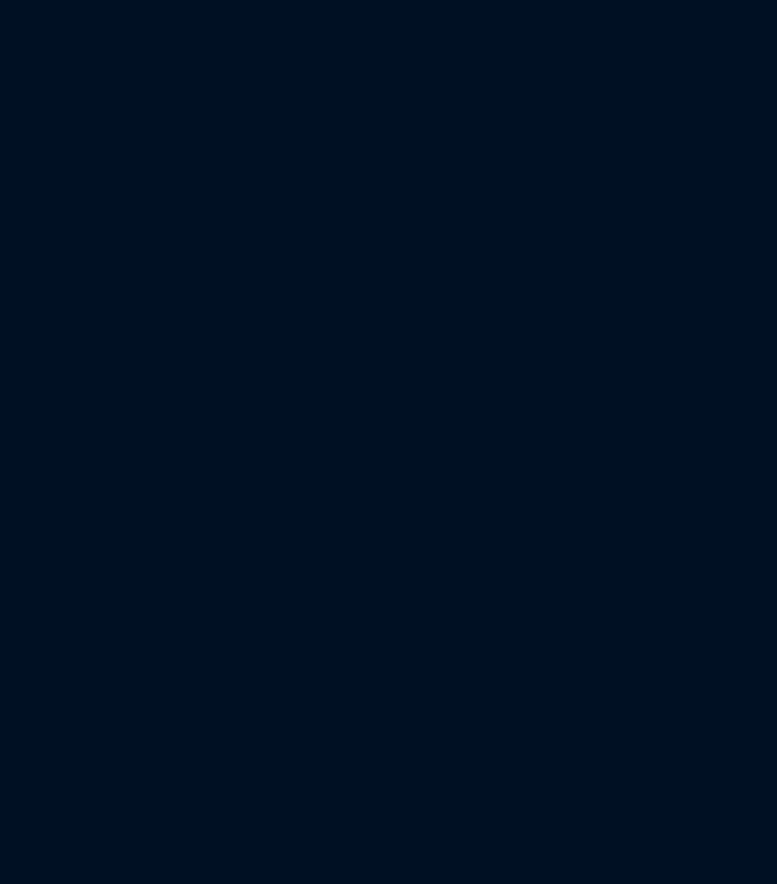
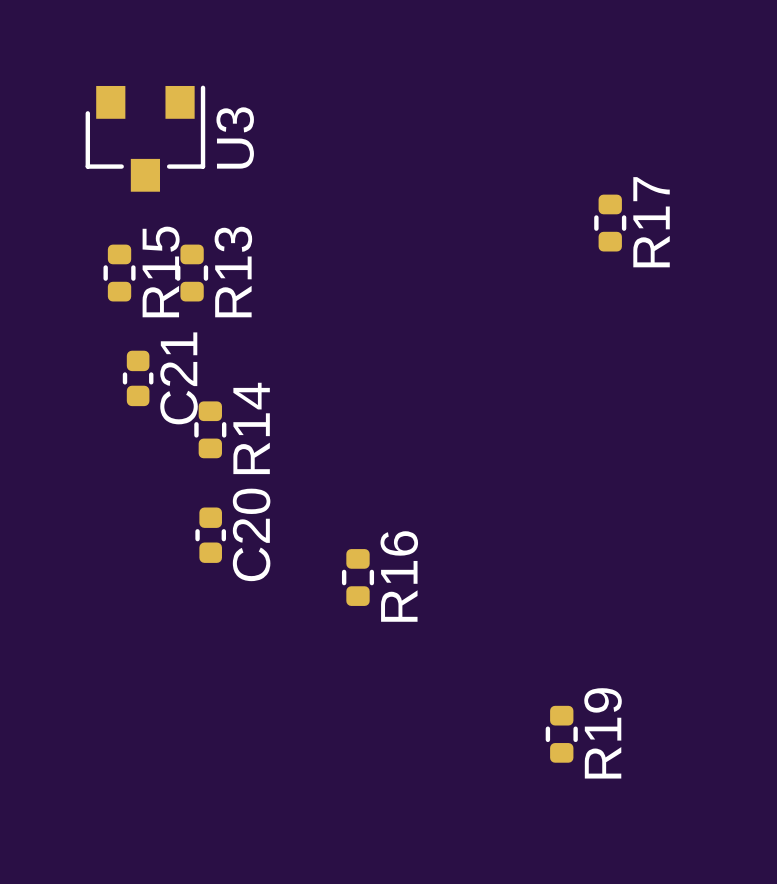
U3: none -> (145, 138)
R17: none -> (610, 223)
R15: none -> (119, 273)
R13: none -> (192, 273)
C21: none -> (138, 378)
R14: none -> (210, 429)
C20: none -> (210, 535)
R16: none -> (357, 577)
R19: none -> (561, 734)

